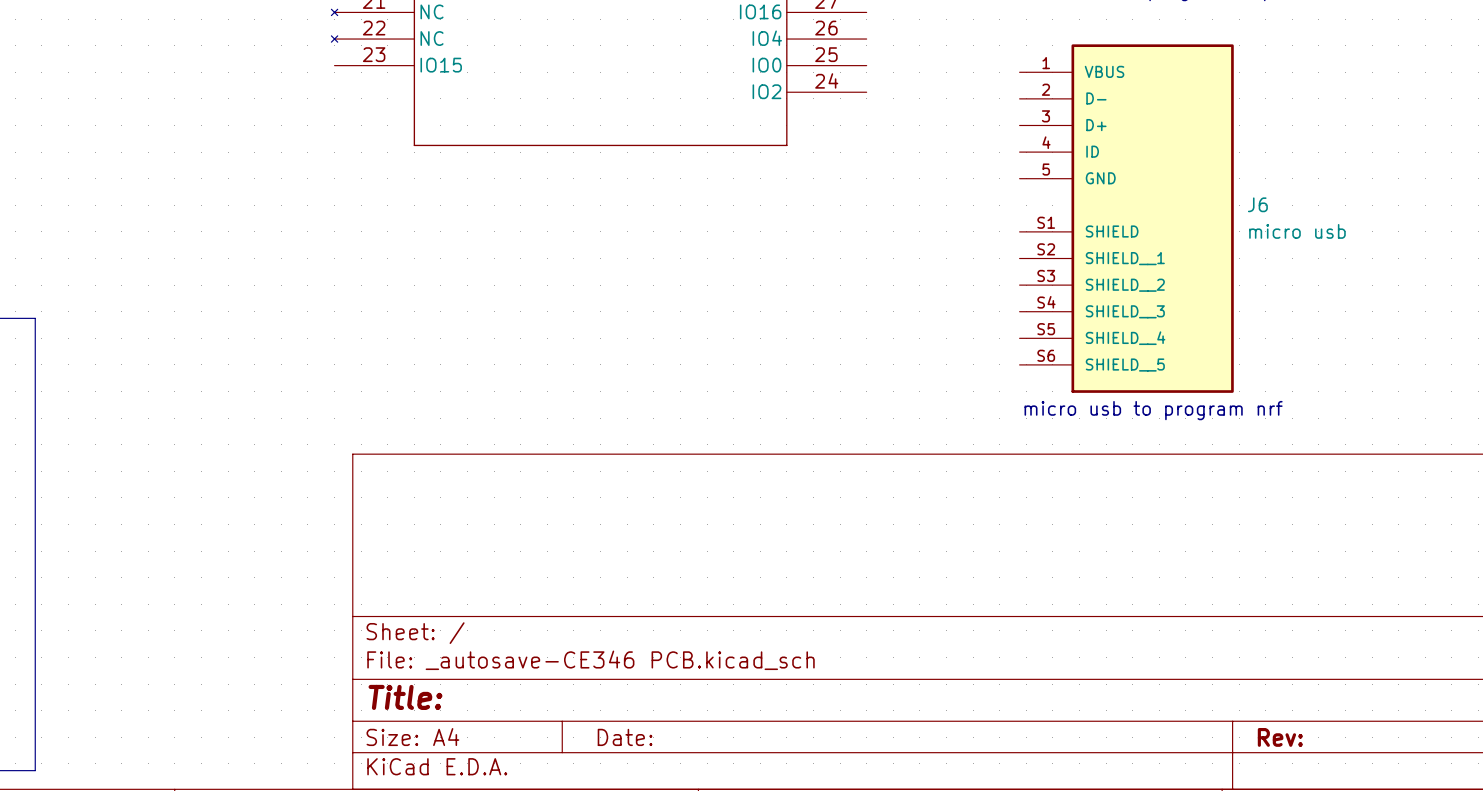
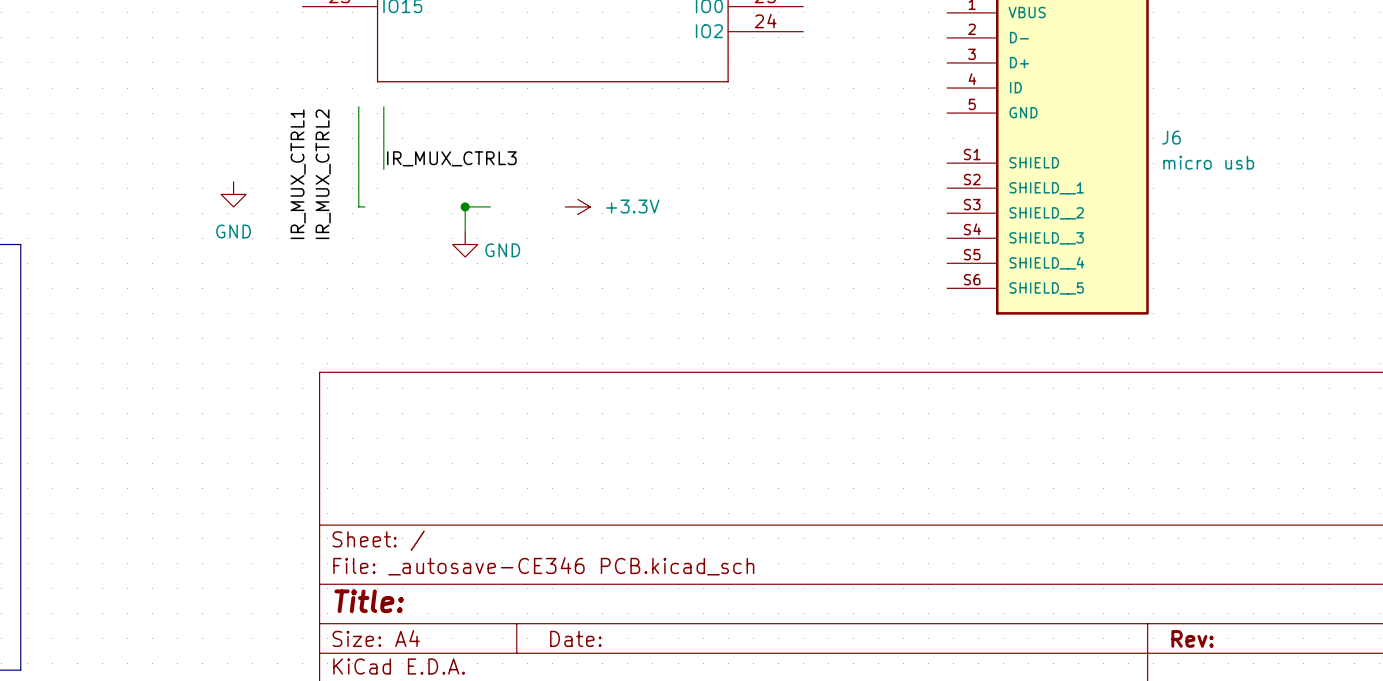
wire: none -> (358, 106) (358, 206) (365, 206)
wire: none -> (383, 106) (383, 169)
label: none -> IR_MUX_CTRL3 (451, 158)
label: none -> IR_MUX_CTRL1 (298, 174)
label: none -> IR_MUX_CTRL2 (323, 174)
power symbol: none -> GND (233, 194)
junction: none -> (465, 206)
wire: none -> (490, 206) (465, 206) (465, 231)
power symbol: none -> +3.3V (577, 206)
power symbol: none -> GND (465, 244)
text: micro usb to program nrf (1153, 410) -> none

